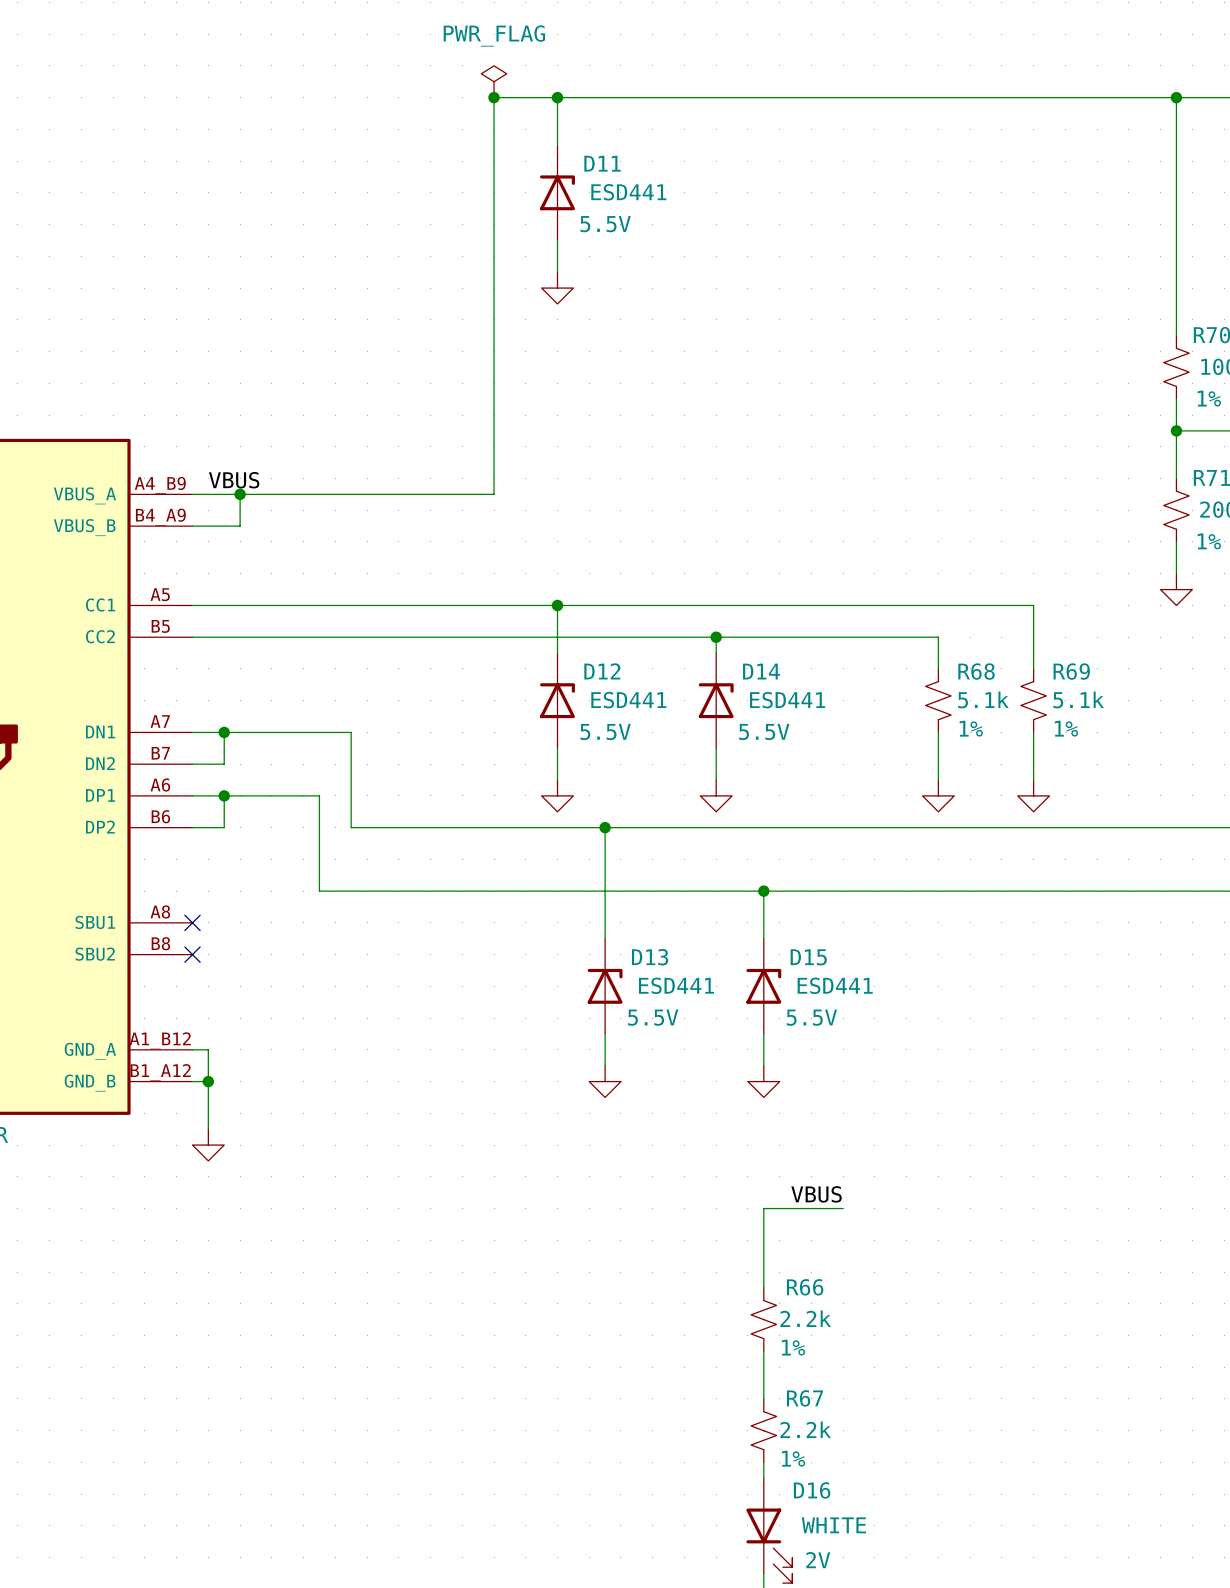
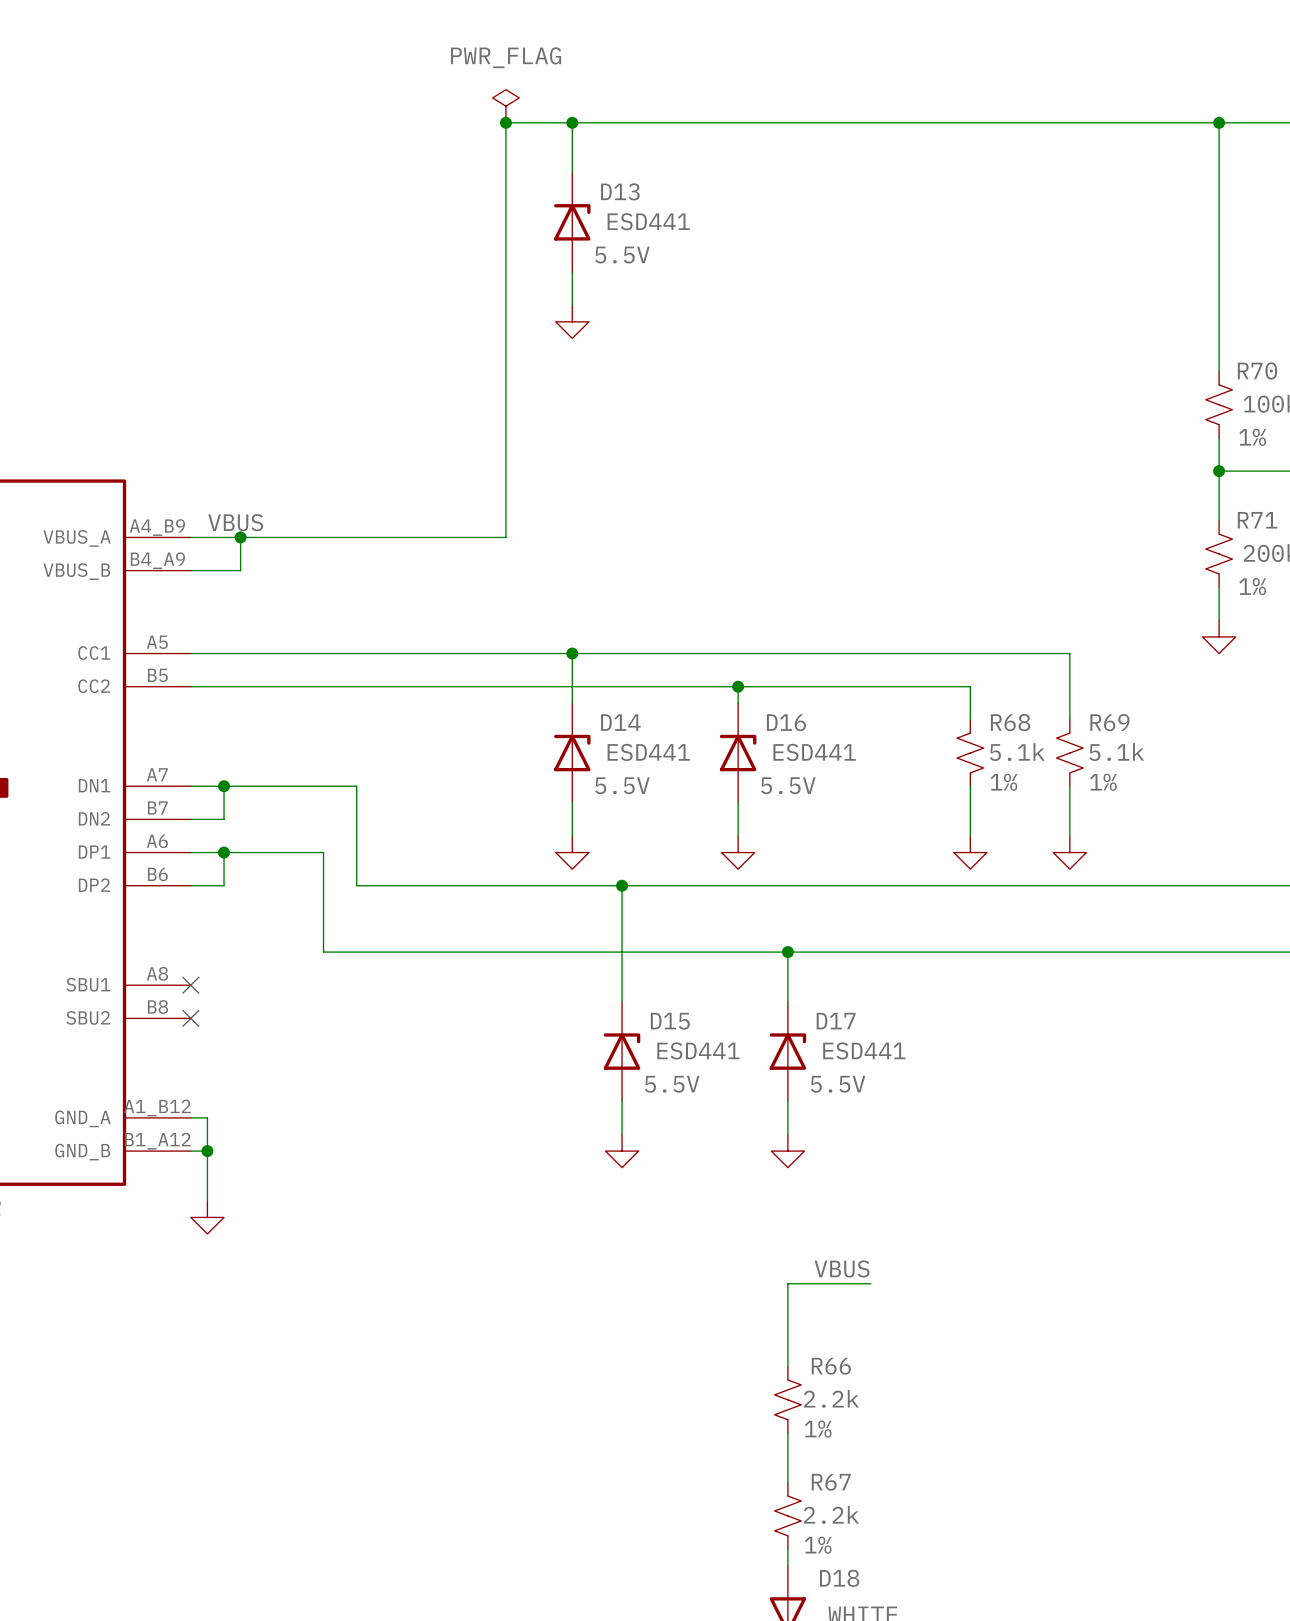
D11 name: D11 (602, 163) -> D13 (620, 191)
D12 name: D12 (602, 671) -> D14 (620, 722)
D14 name: D14 (761, 671) -> D16 (786, 722)
D13 name: D13 (650, 957) -> D15 (670, 1021)
D15 name: D15 (808, 957) -> D17 (836, 1021)
D16 name: D16 (812, 1490) -> D18 (839, 1578)

